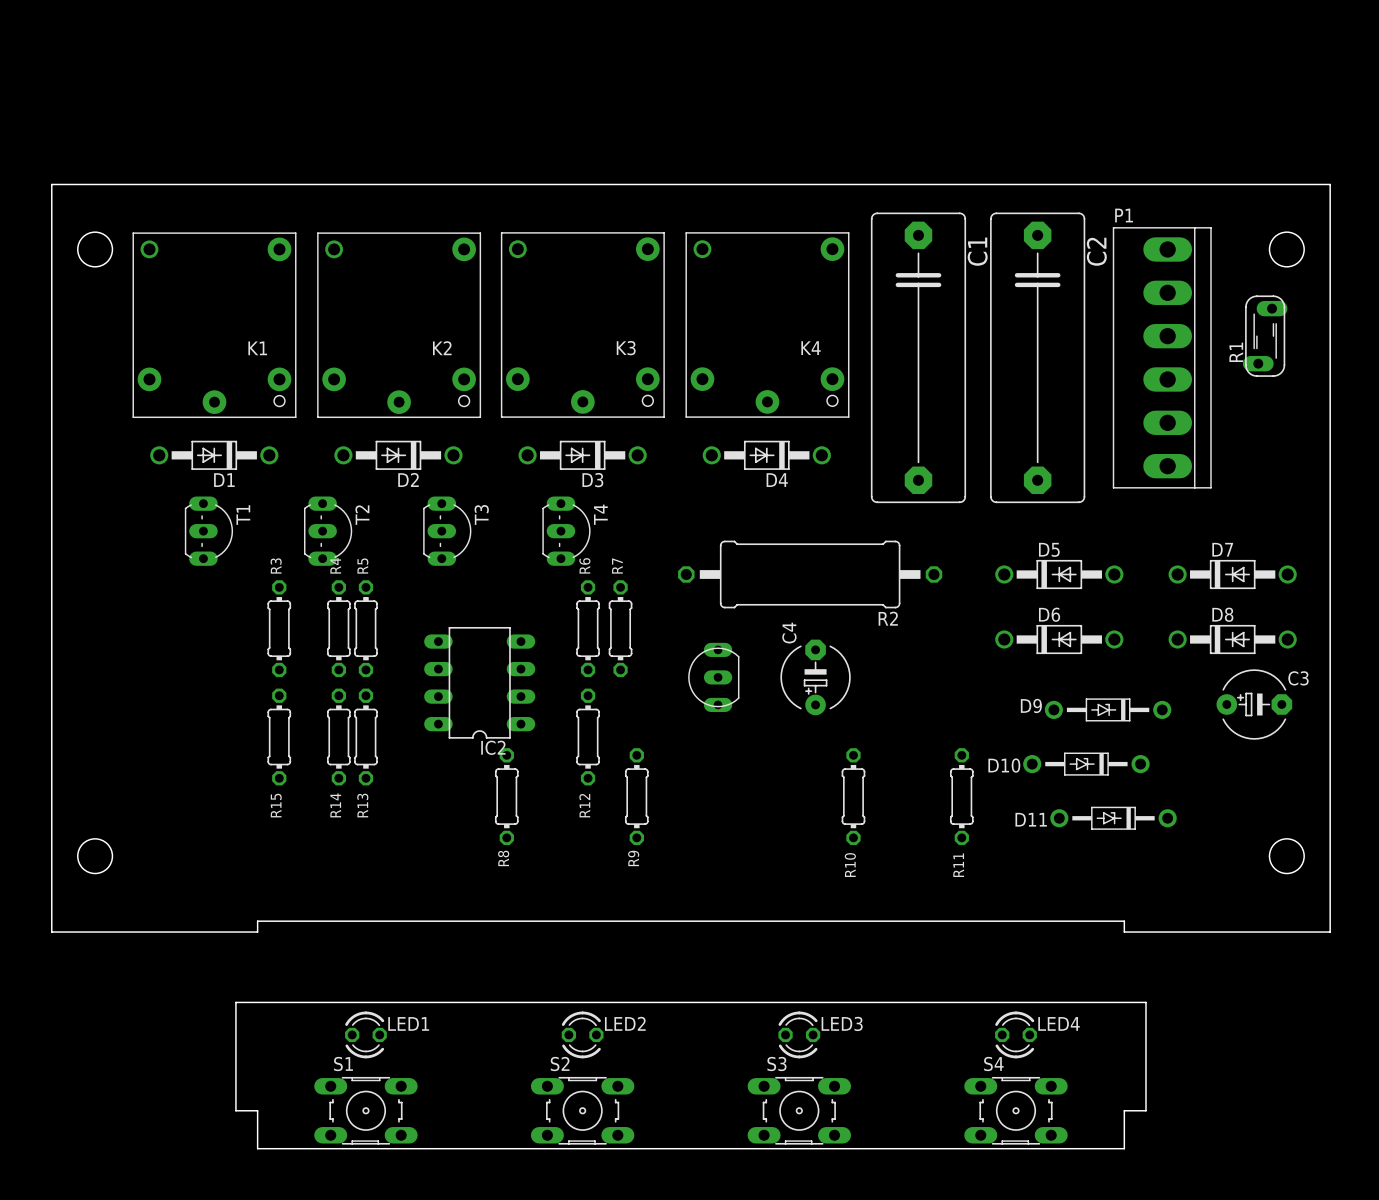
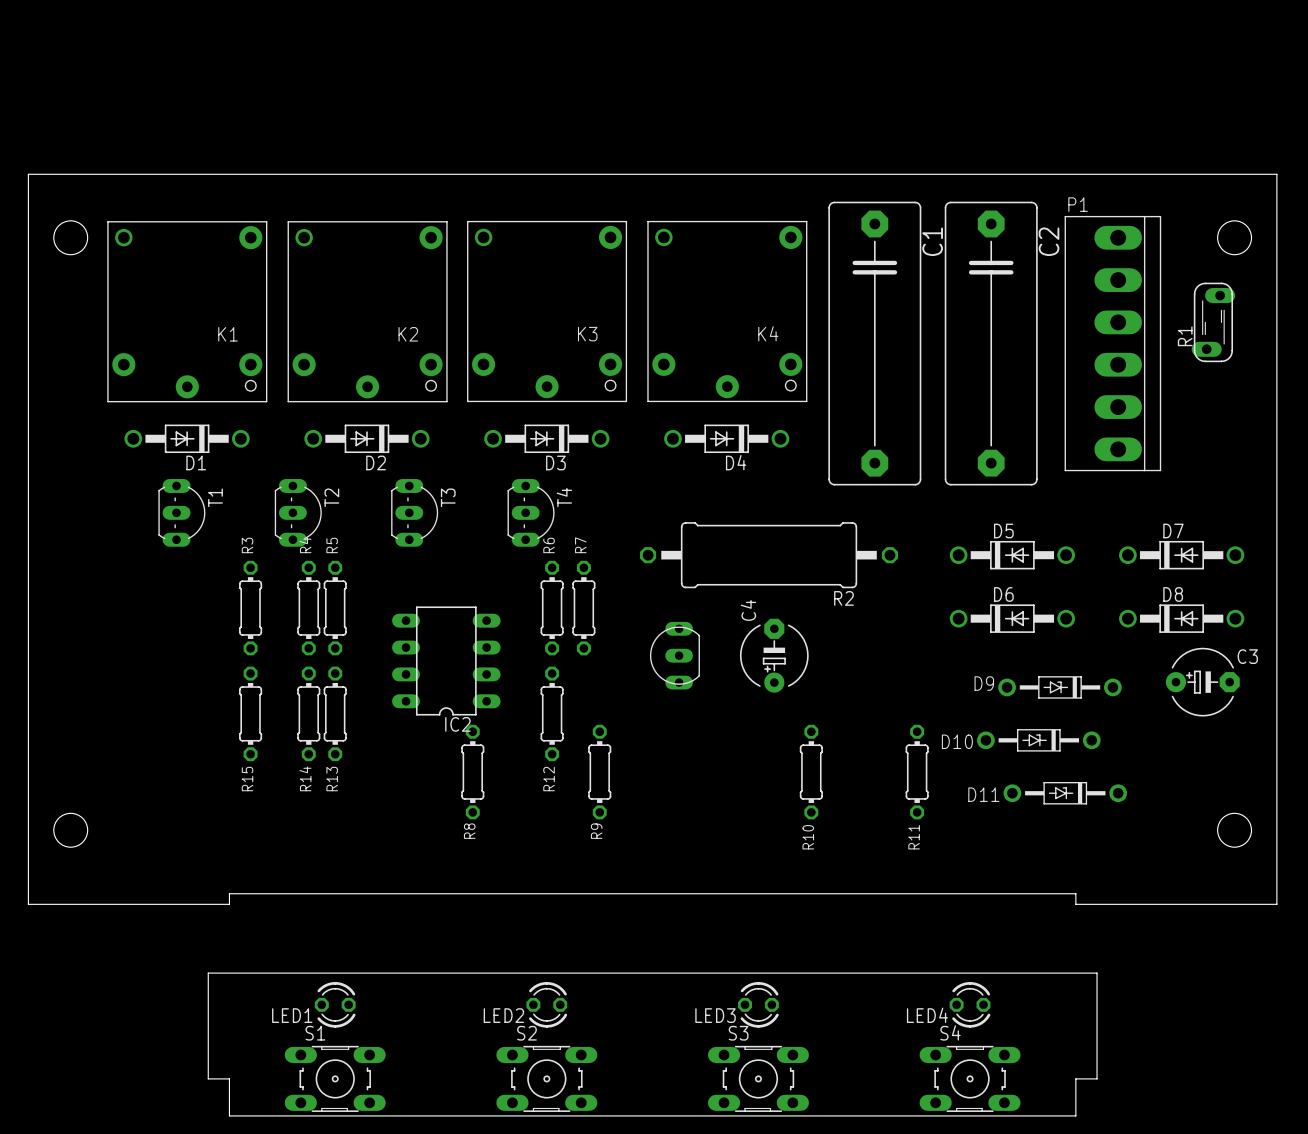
LED1 rotation: 0° (365, 1034) -> 180° (335, 1004)
LED2 rotation: 0° (582, 1034) -> 180° (546, 1004)
LED3 rotation: 0° (799, 1034) -> 180° (758, 1004)
LED4 rotation: 0° (1015, 1034) -> 180° (970, 1004)

